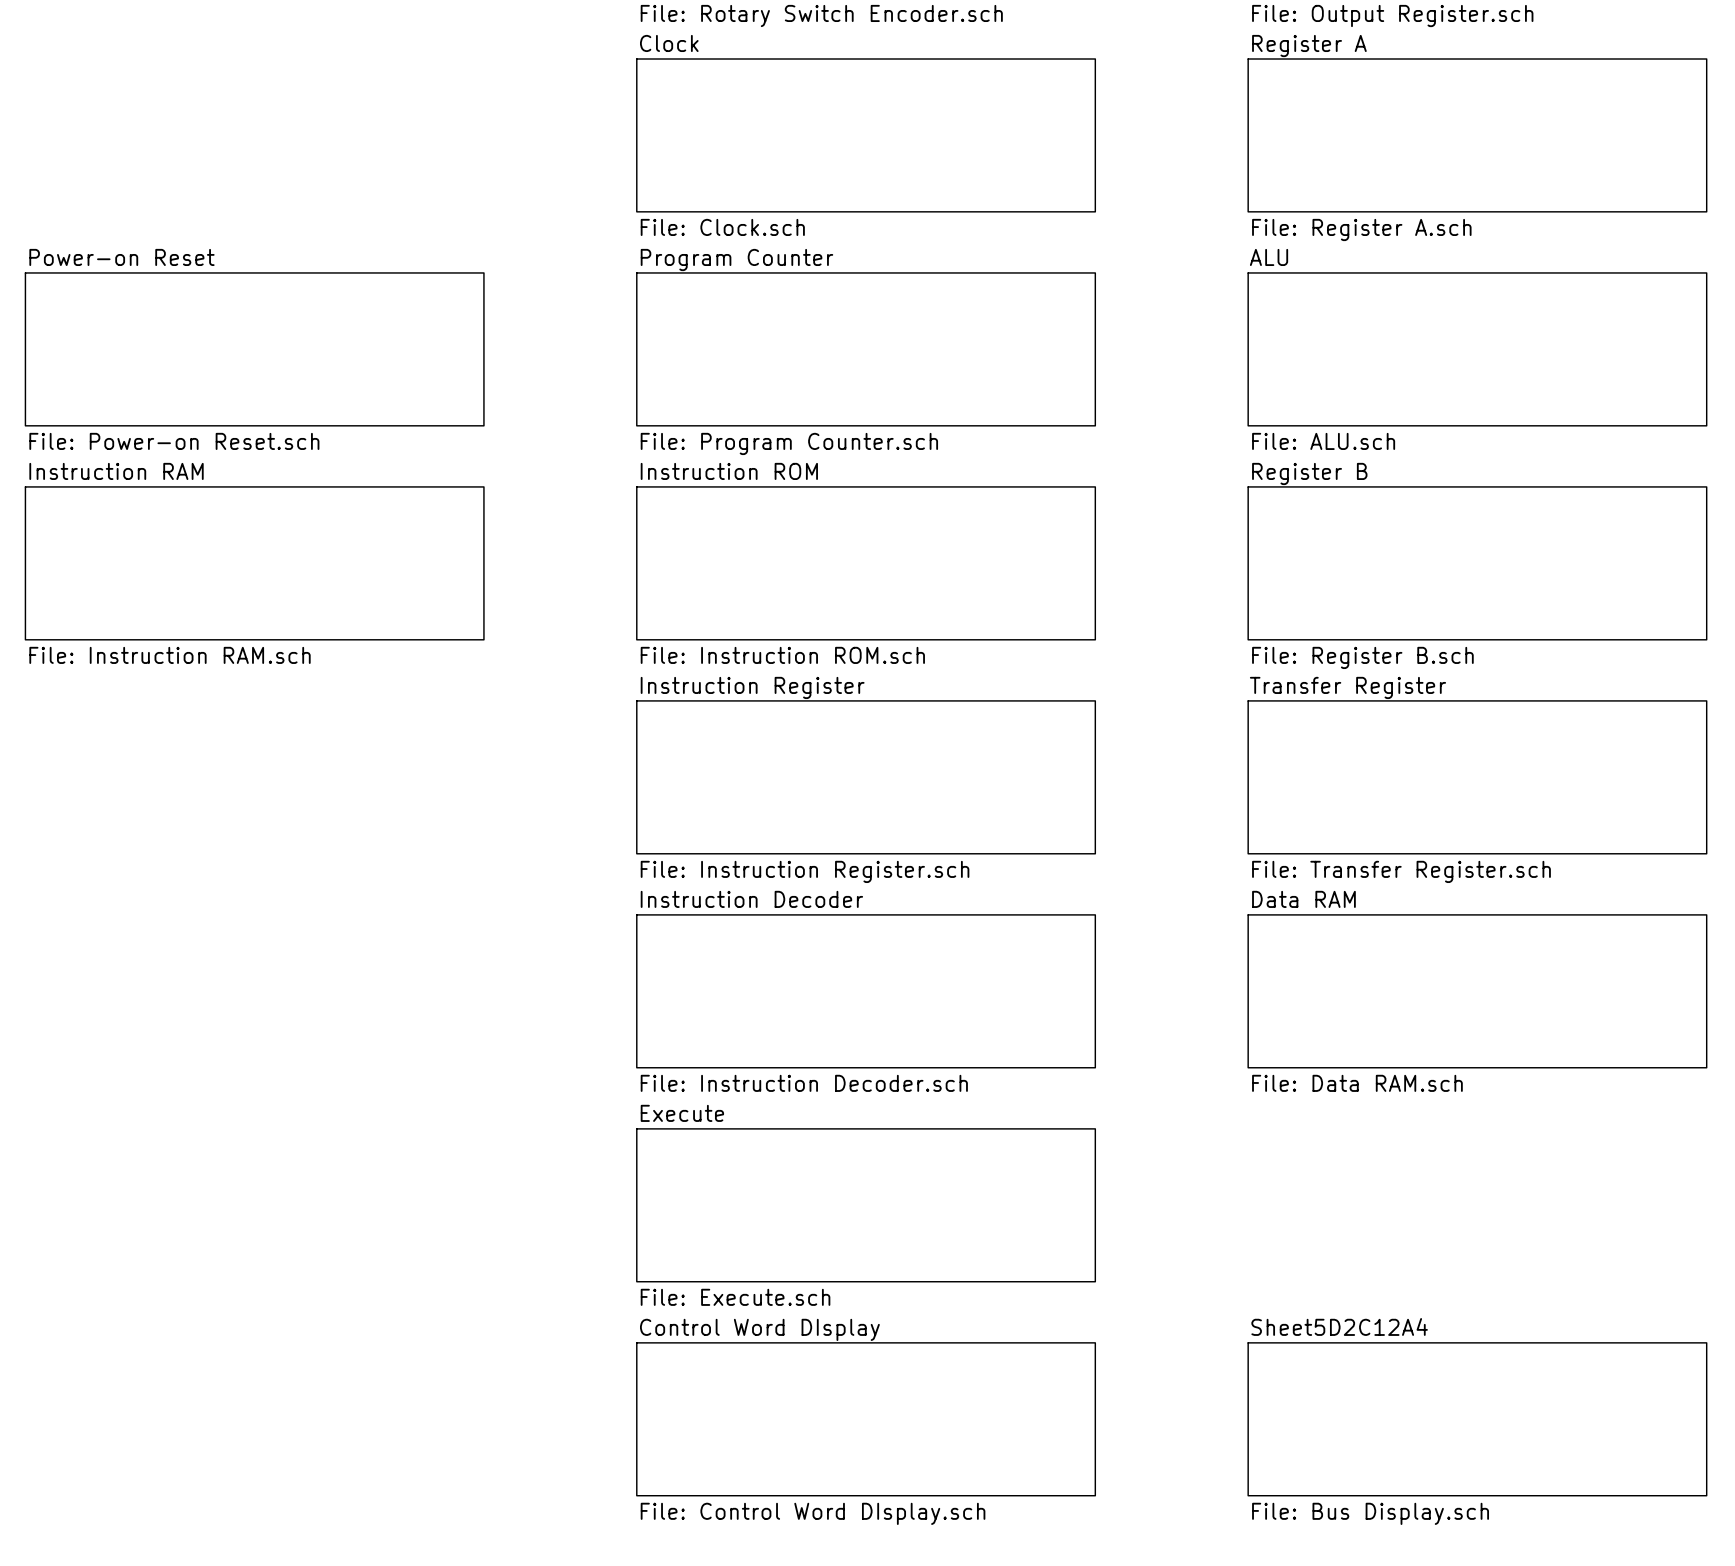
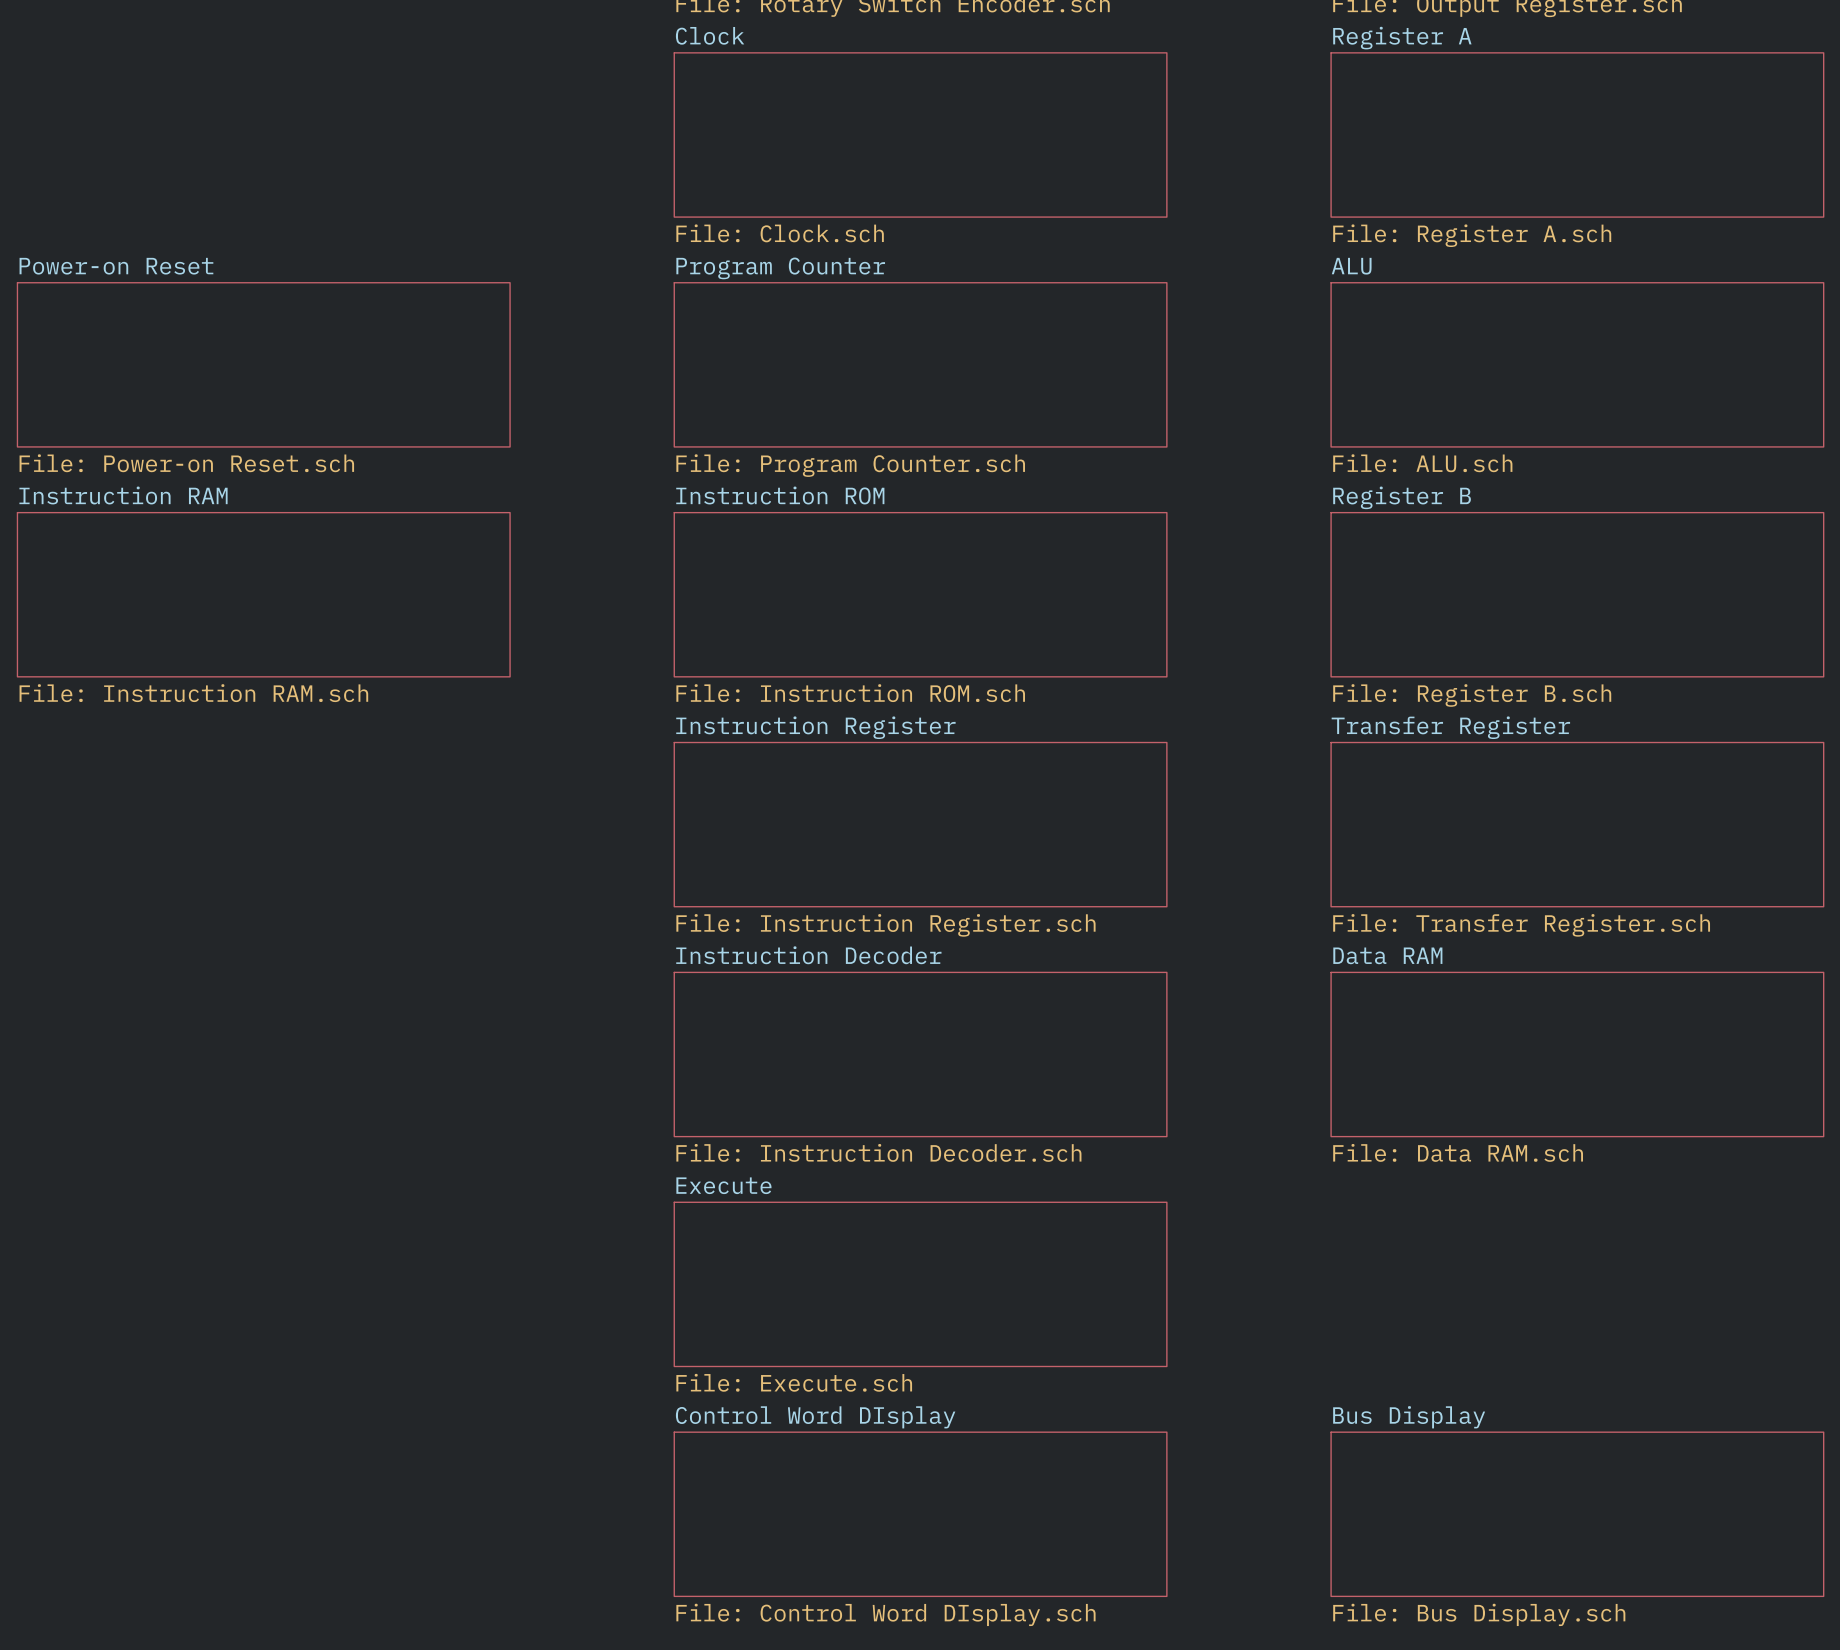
sheet Sheet5D2C12A4 name: Sheet5D2C12A4 (1339, 1326) -> Bus Display (1409, 1417)

